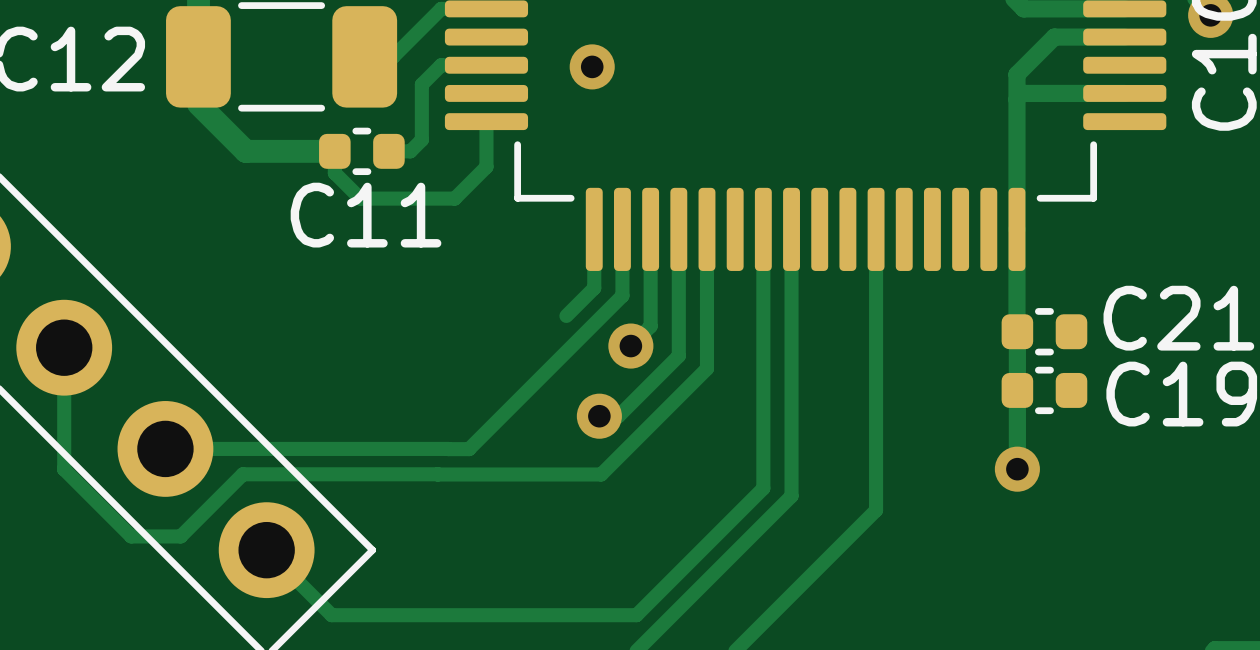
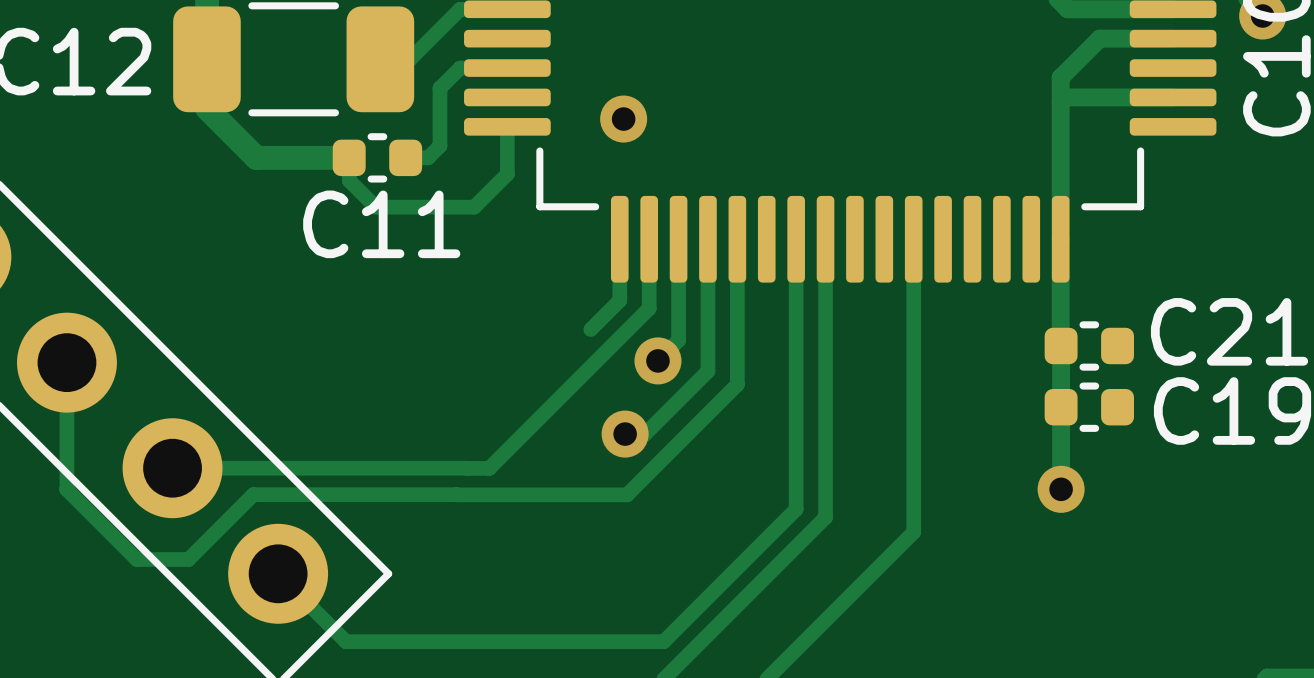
via position: (592, 66) -> (623, 119)

